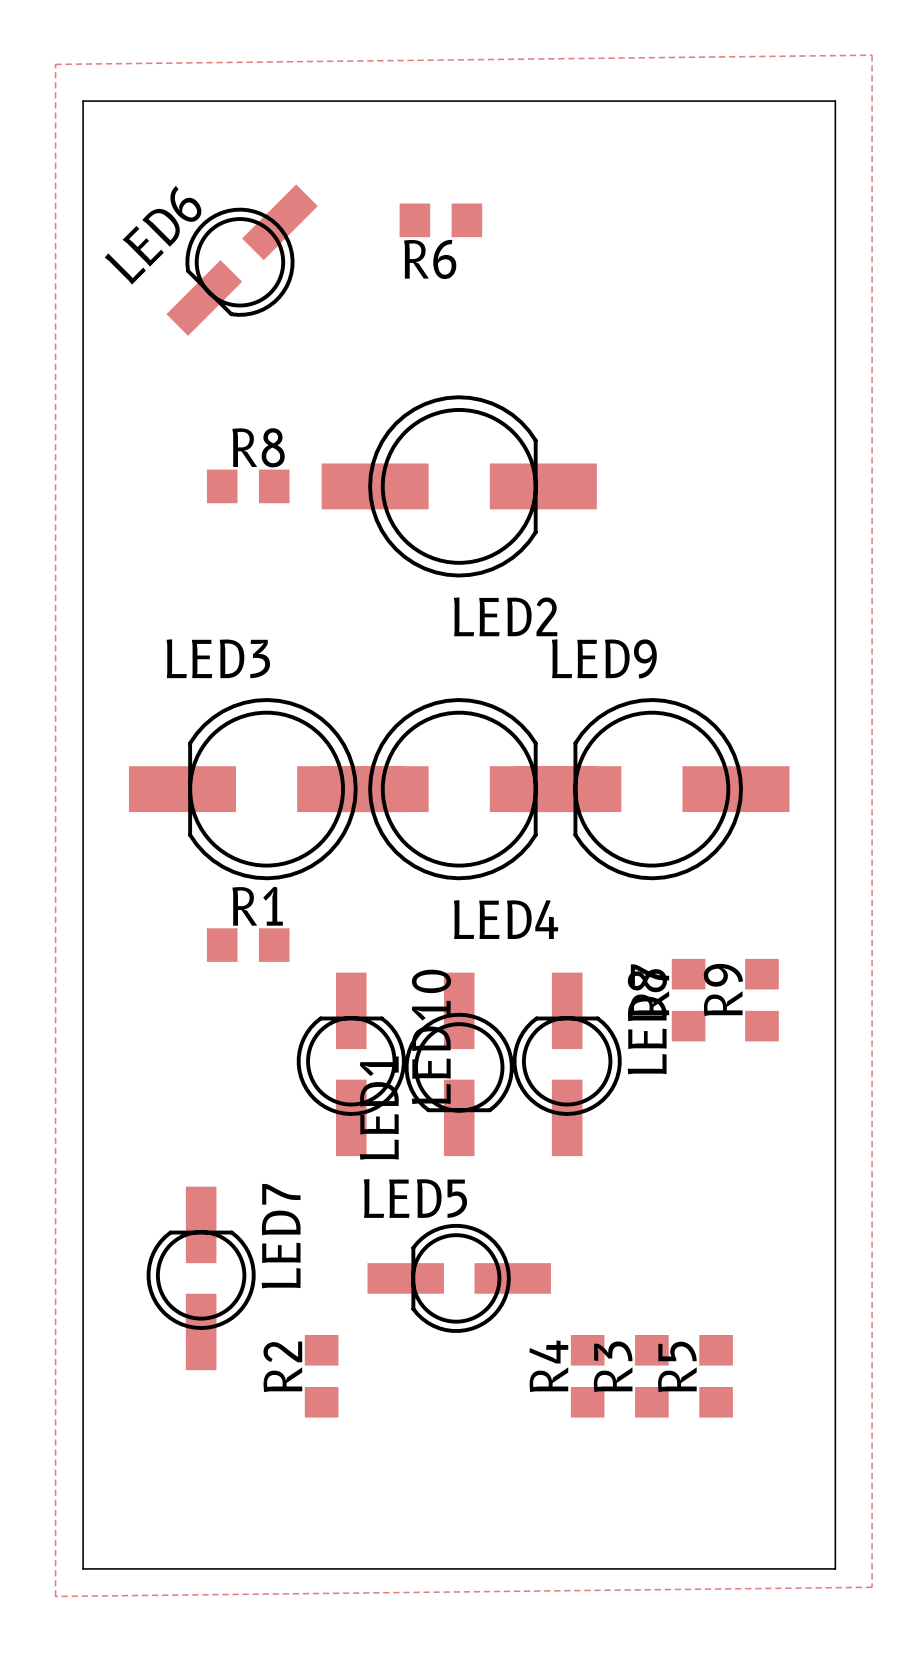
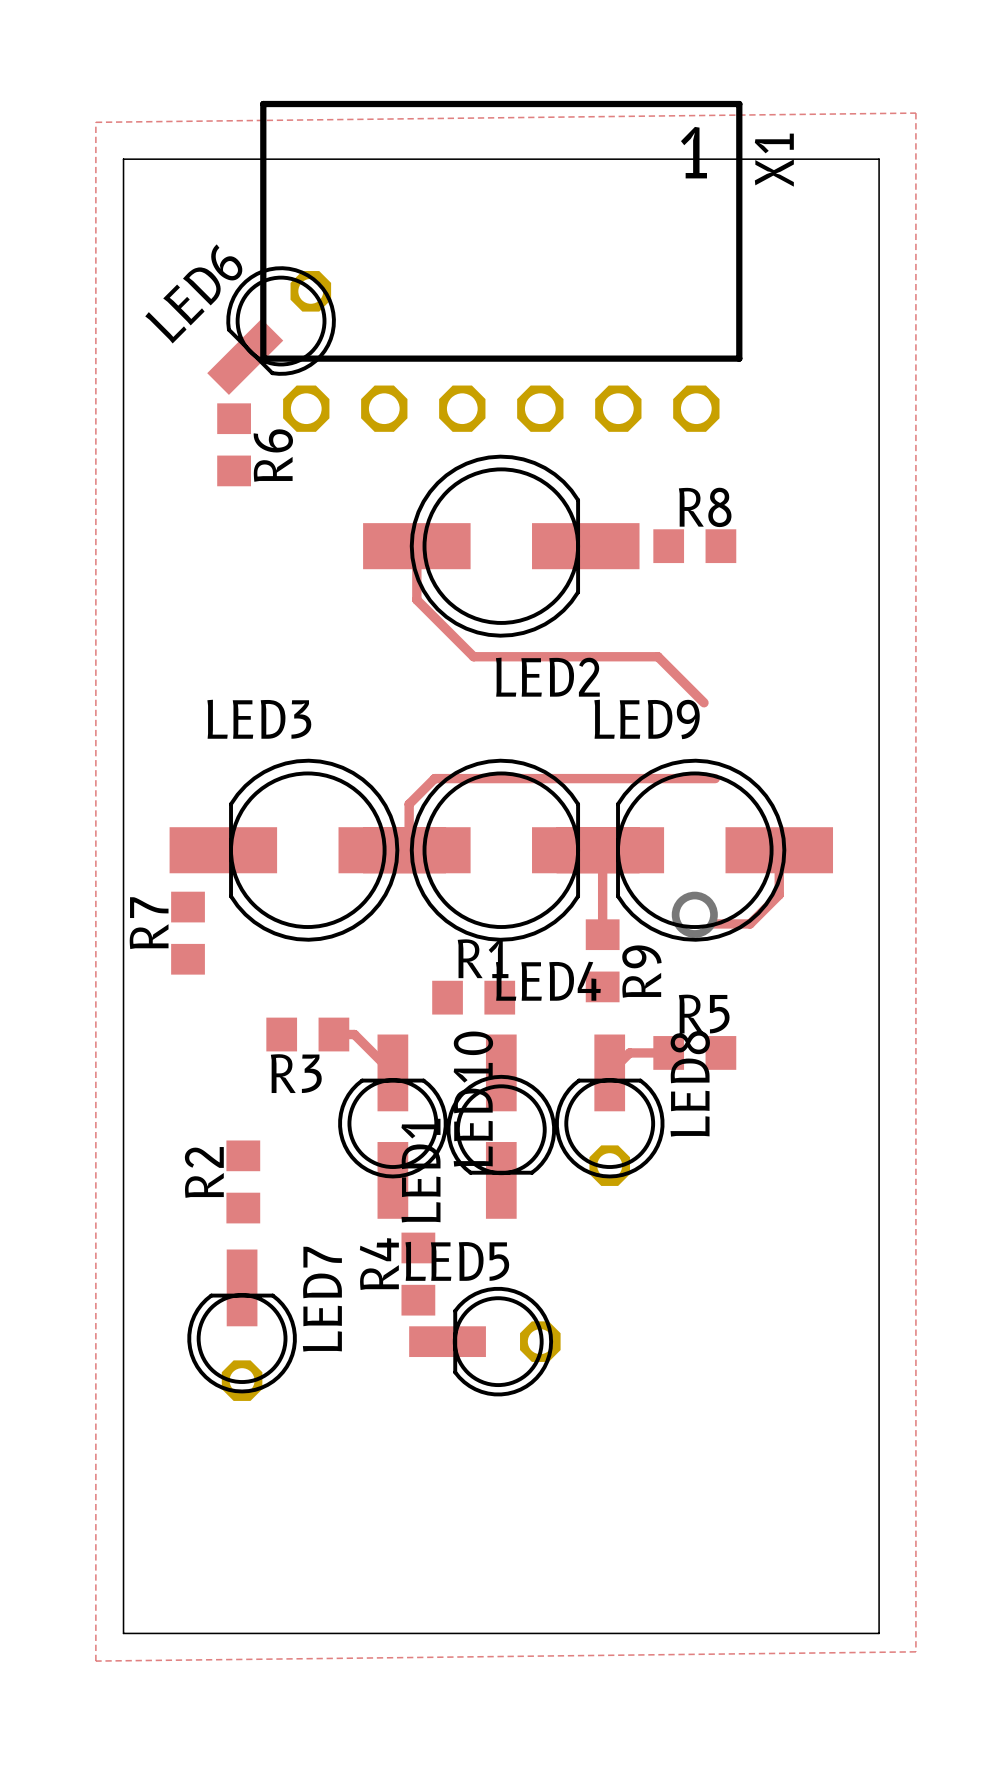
LED6 footprint: [166, 184, 318, 336] -> [207, 266, 336, 395]
X1: none -> (501, 266)
R6 rotation: 0° (440, 220) -> 90° clockwise (234, 444)
R6 position: (440, 220) -> (234, 444)
R6 name position: R6 (430, 259) -> R6 (273, 455)
R8 position: (248, 486) -> (694, 546)
track: none -> (416, 546) (416, 599) (473, 656) (657, 656) (704, 702)
track: none -> (715, 778) (434, 778) (409, 804) (409, 842) (416, 850)
track: none -> (610, 850) (602, 857) (602, 934)
track: none -> (779, 850) (779, 894) (750, 923) (704, 923) (694, 914)
via: none -> (694, 914)
R1 position: (248, 945) -> (473, 997)
track: none -> (333, 1034) (354, 1034) (392, 1072)
LED8 footprint: [512, 972, 622, 1157] -> [554, 1034, 665, 1186]
R9 name position: R9 (723, 989) -> R9 (641, 971)
track: none -> (668, 1052) (629, 1052) (609, 1072)
R7 position: (688, 1000) -> (188, 933)
R9 position: (761, 1000) -> (602, 960)
LED7 footprint: [146, 1186, 256, 1371] -> [187, 1249, 297, 1401]
LED5 footprint: [367, 1223, 551, 1333] -> [409, 1286, 561, 1397]
R3 name position: R3 (613, 1366) -> R3 (296, 1073)
R2 position: (321, 1376) -> (243, 1181)
R4 position: (587, 1376) -> (418, 1274)
R3 rotation: 0° (651, 1376) -> 90° clockwise (307, 1034)
R3 position: (651, 1376) -> (307, 1034)
R5 rotation: 0° (716, 1376) -> 90° clockwise (694, 1052)
R5 position: (716, 1376) -> (694, 1052)

